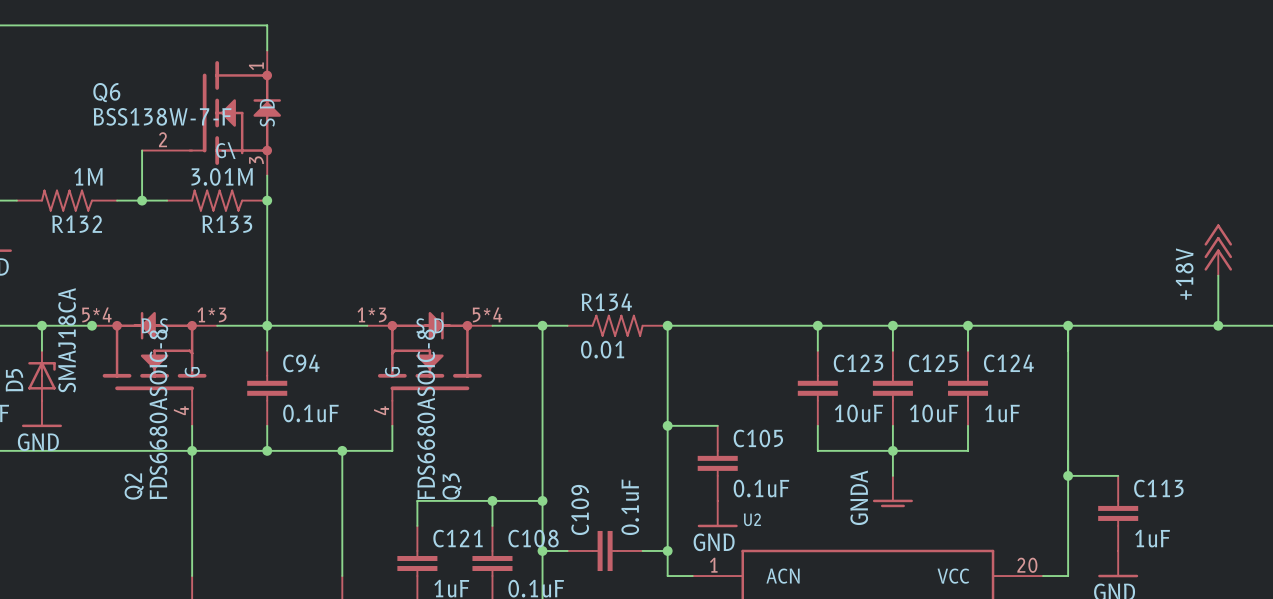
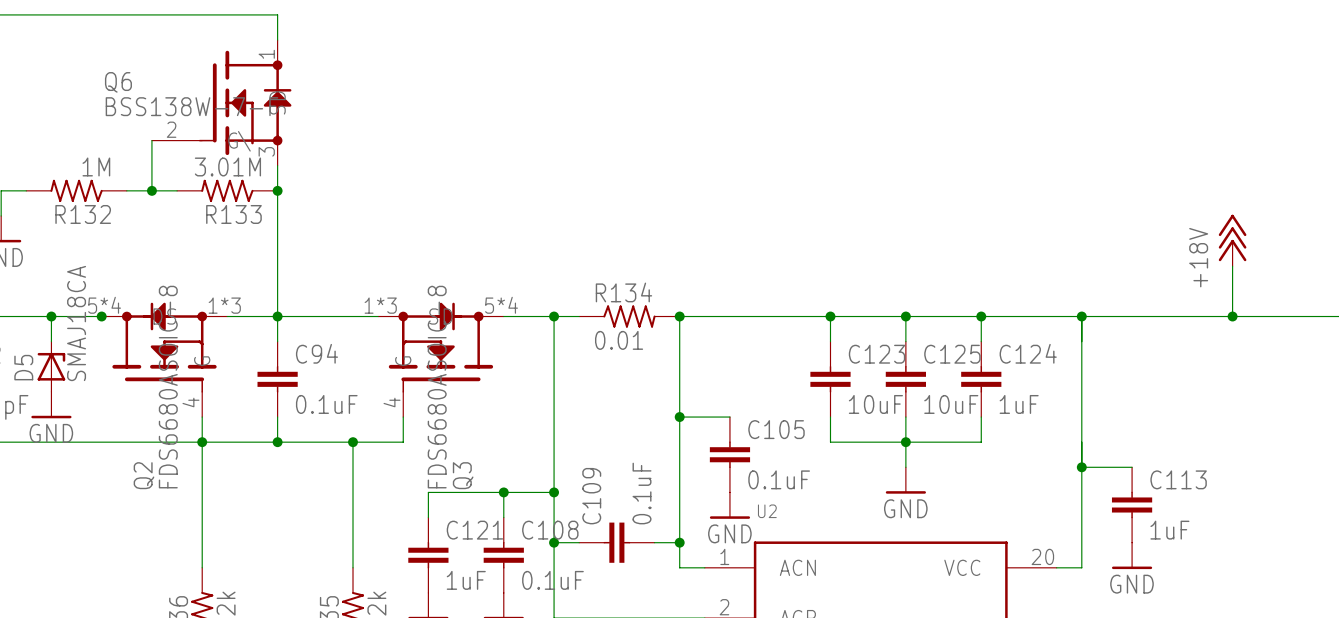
power symbol: GNDA (892, 491) -> GND (905, 480)

